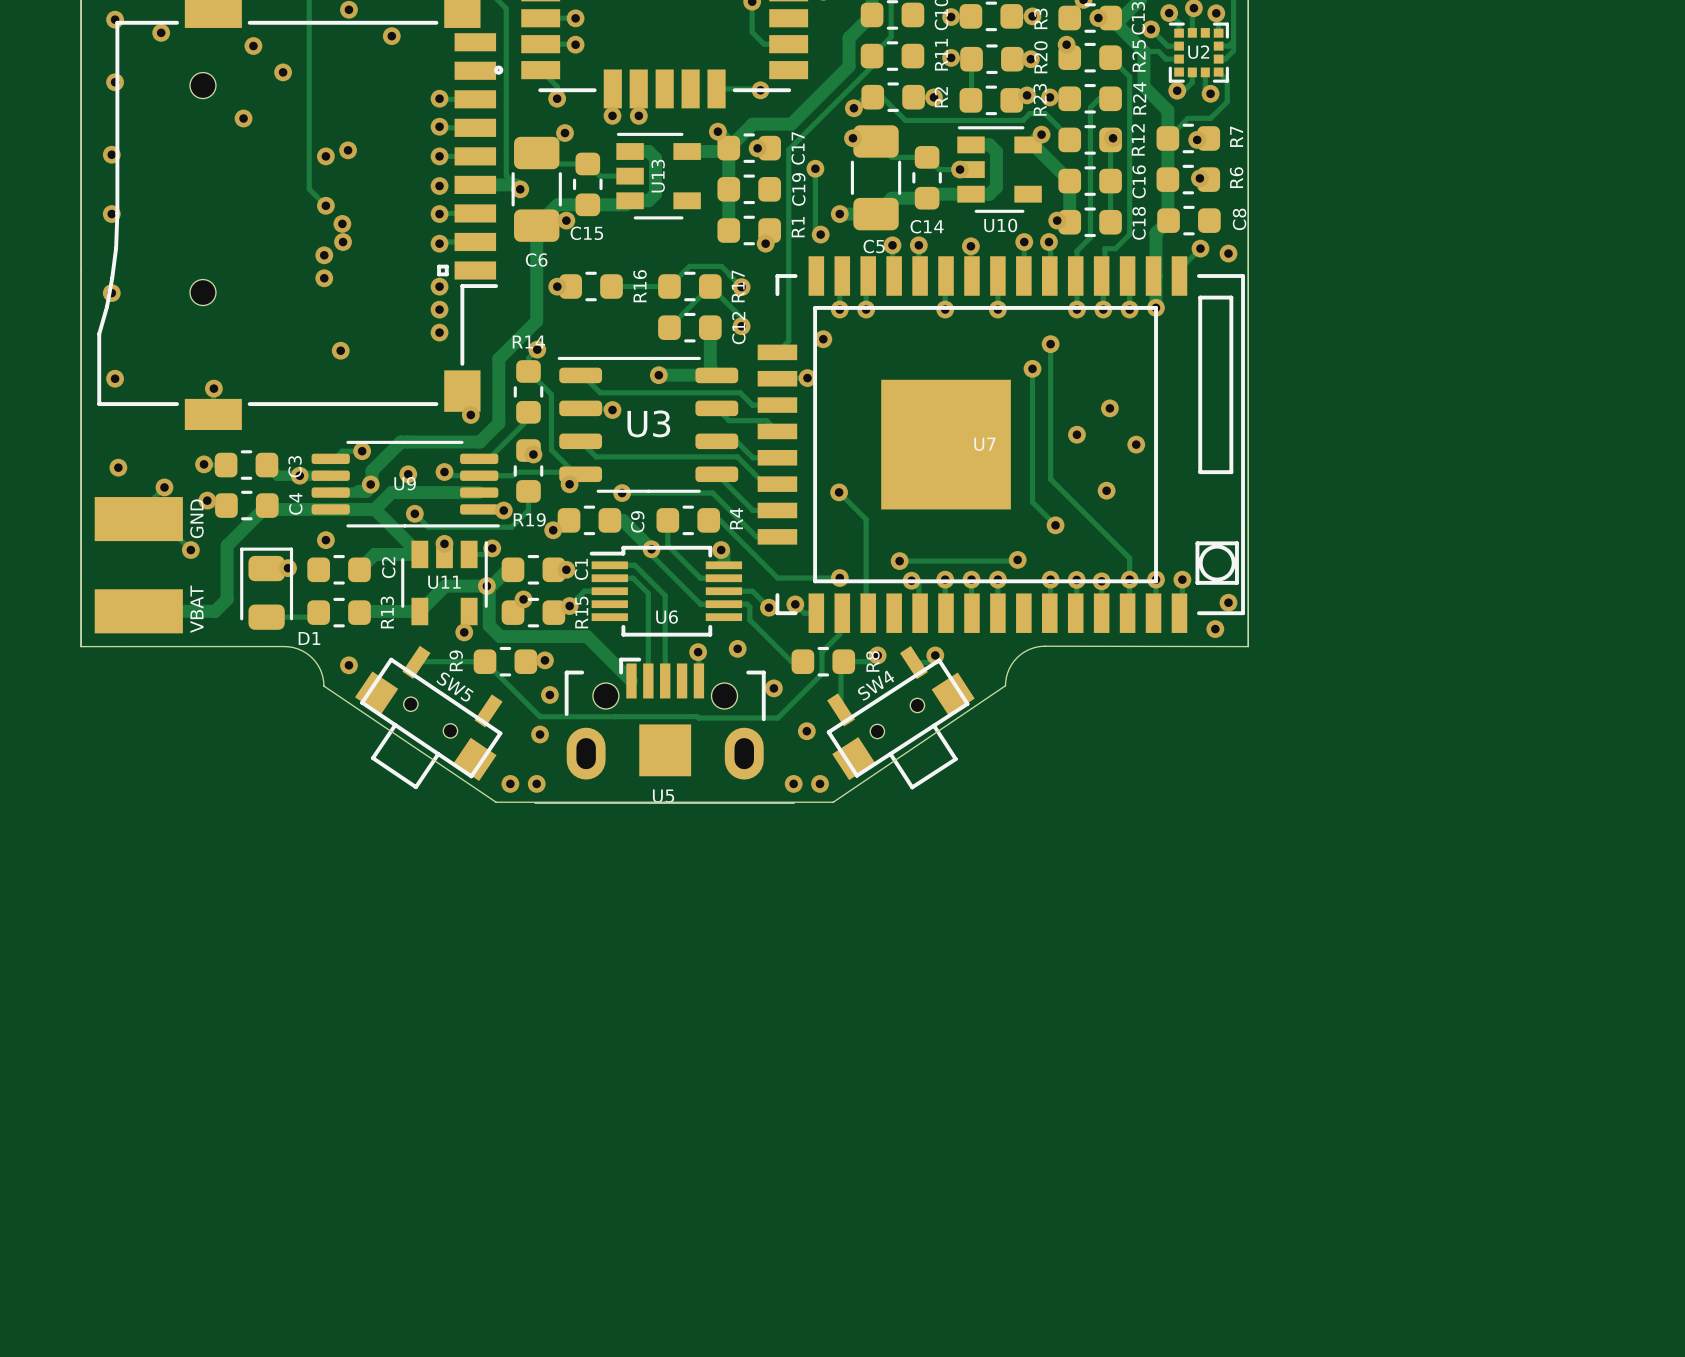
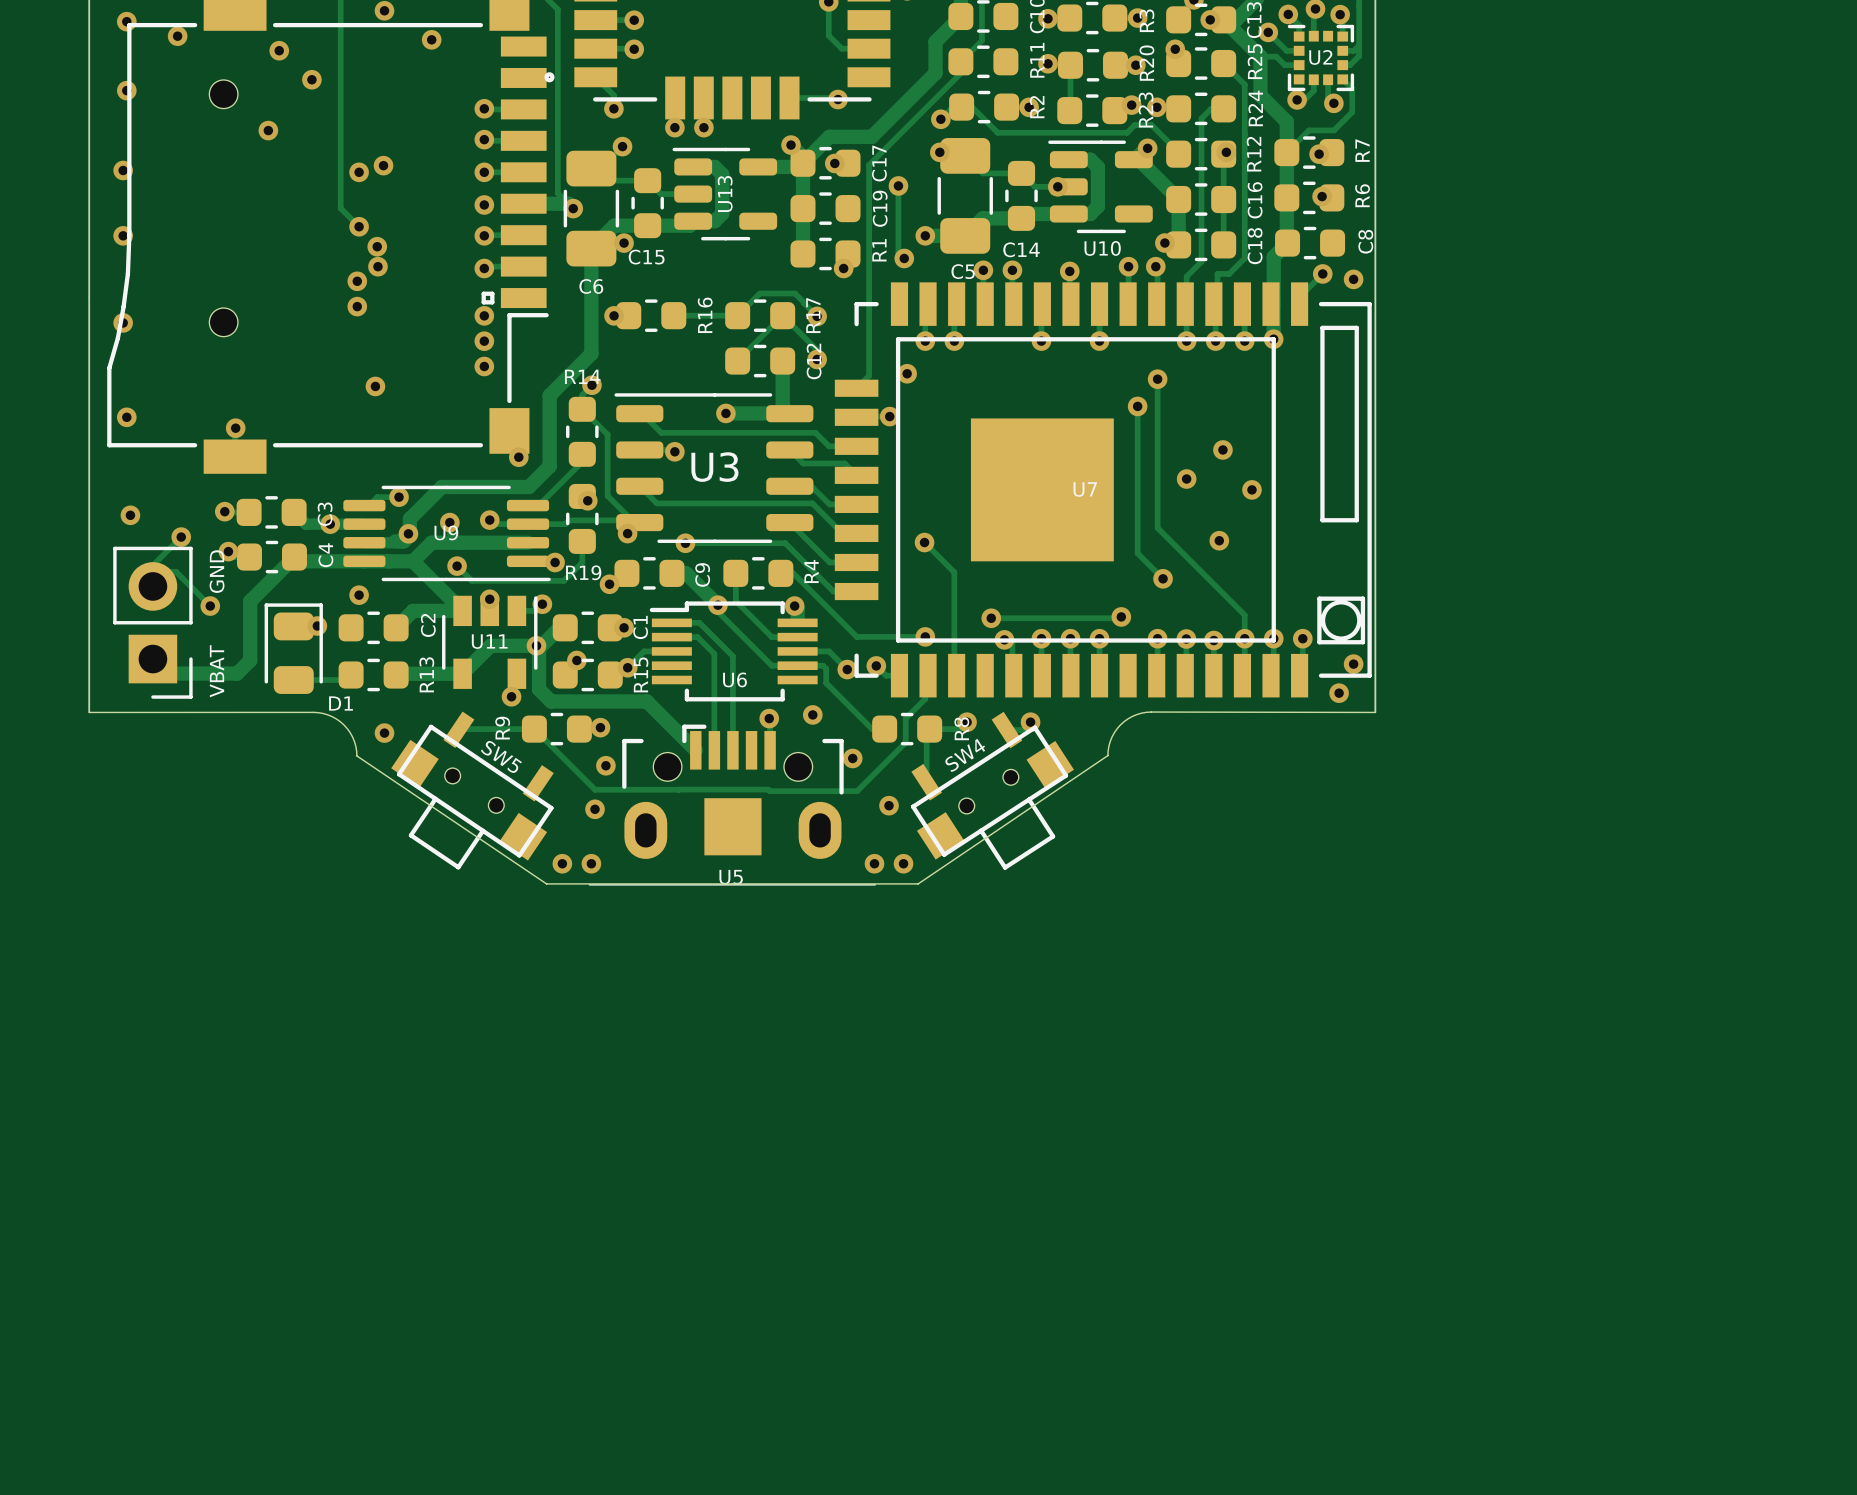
U10 footprint: [957, 126, 1042, 213] -> [1048, 140, 1153, 234]
U13 footprint: [616, 132, 701, 220] -> [672, 147, 778, 241]
part footprint: [94, 497, 183, 634] -> [113, 546, 193, 699]

